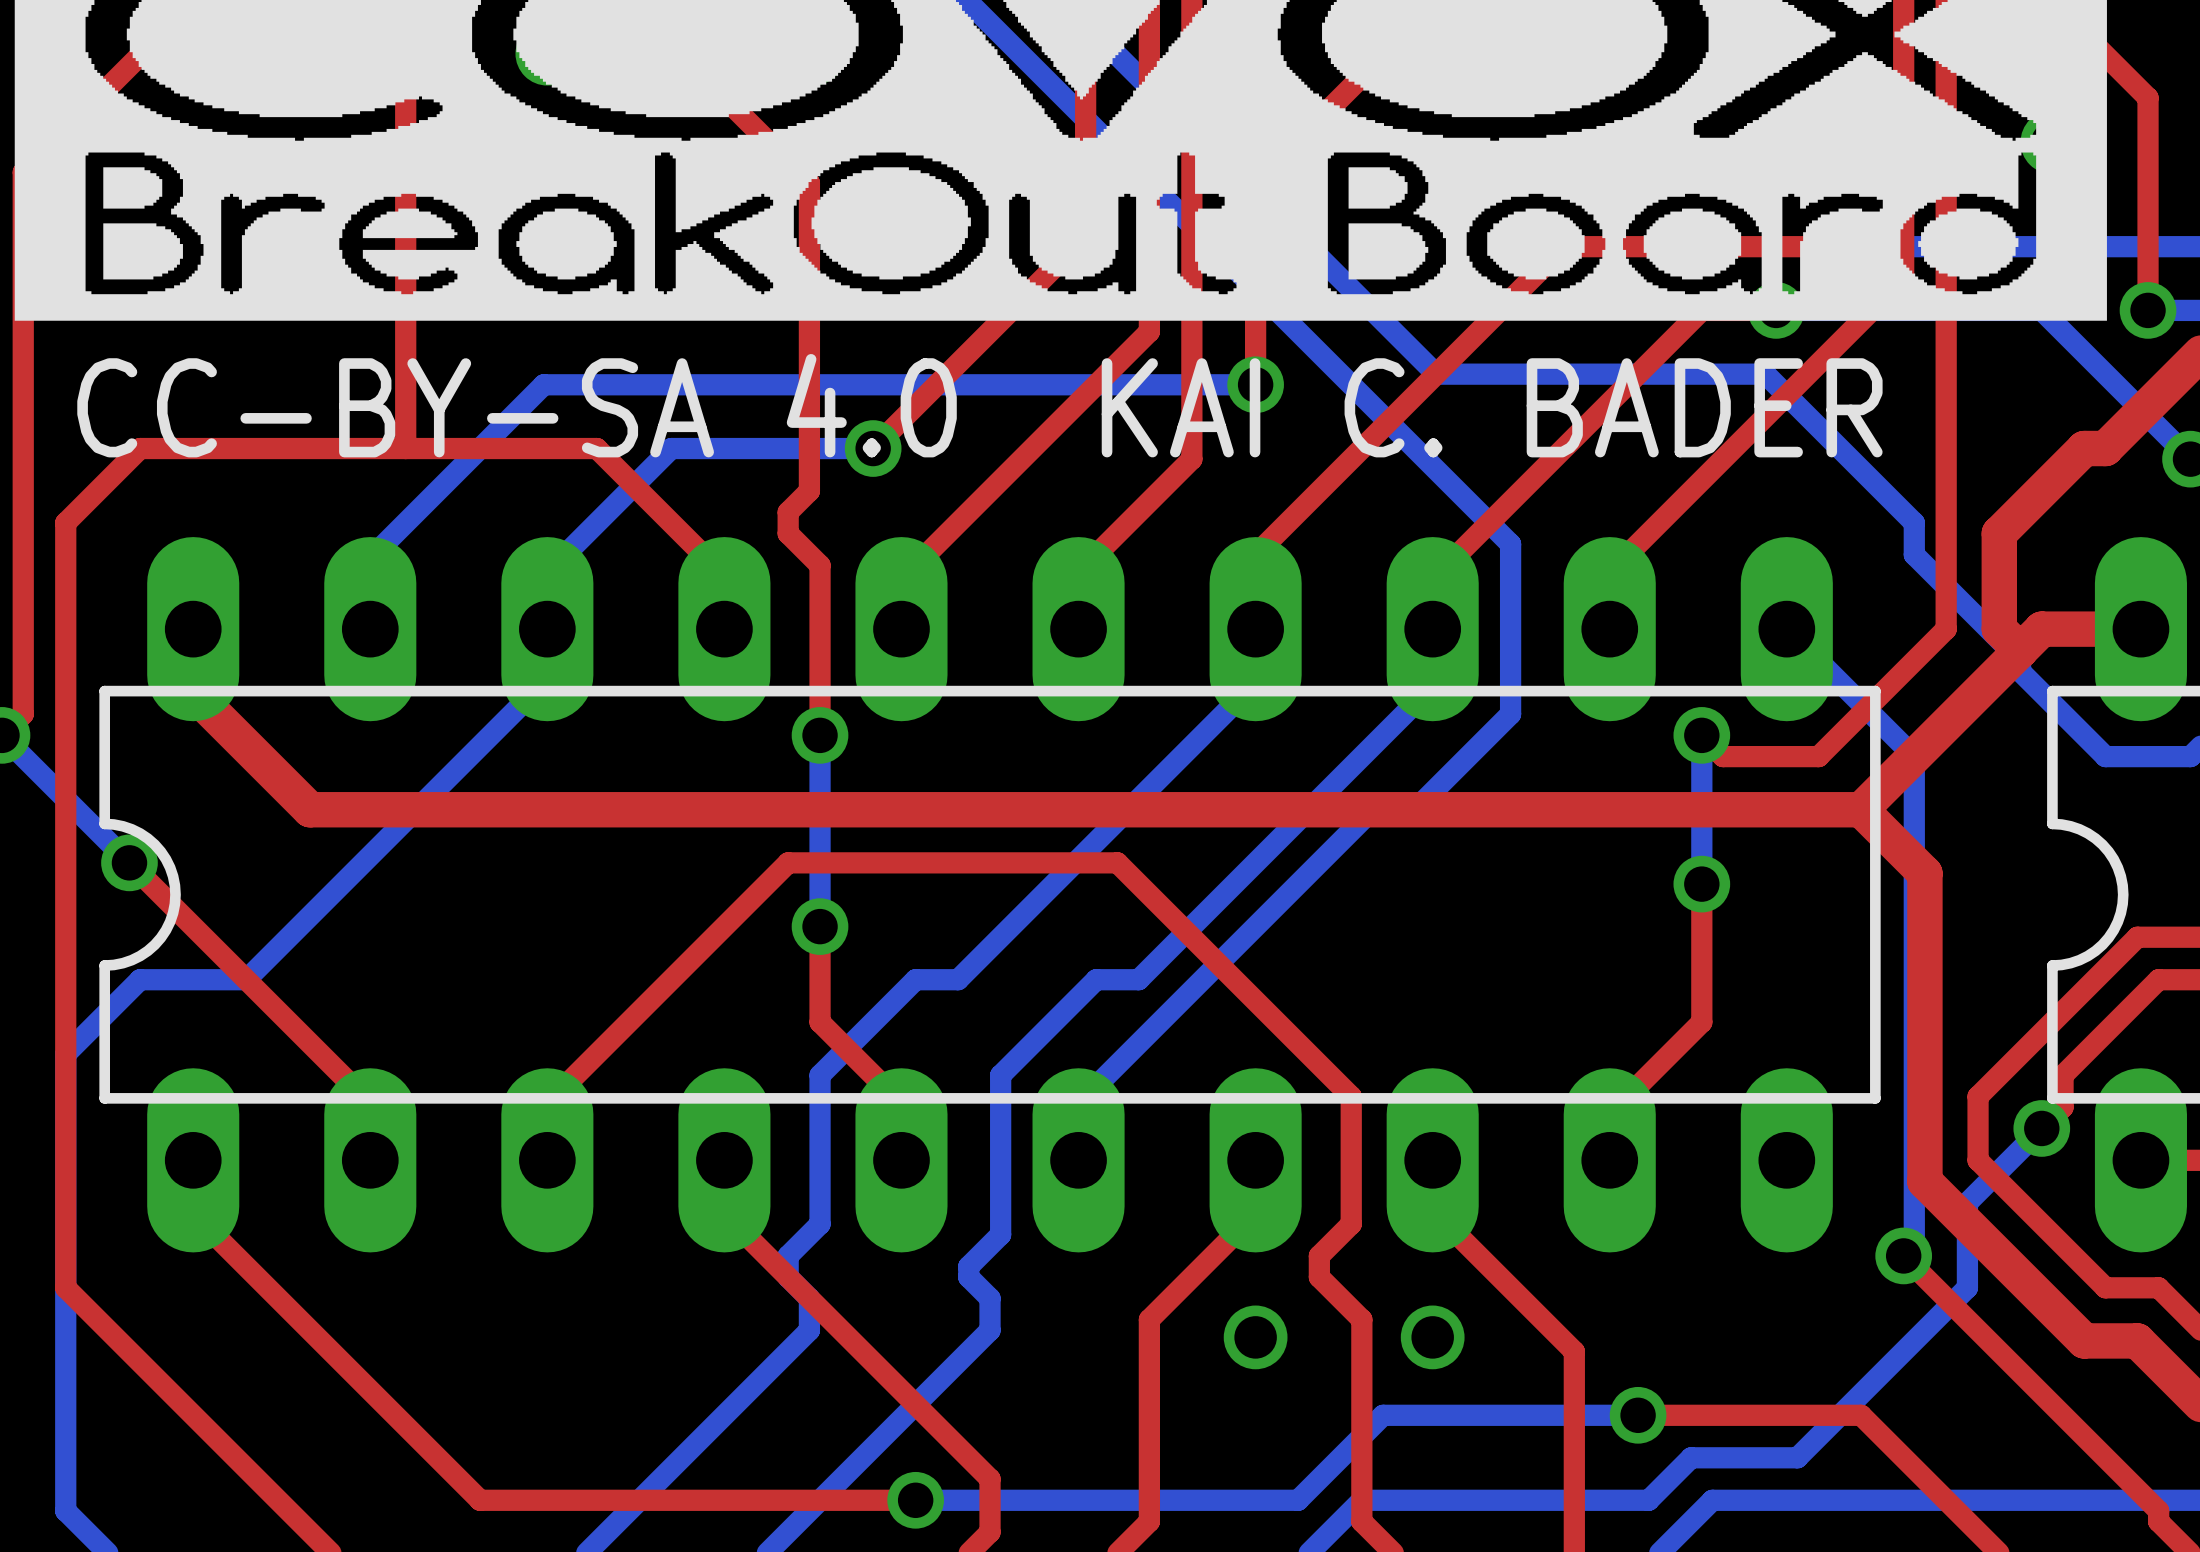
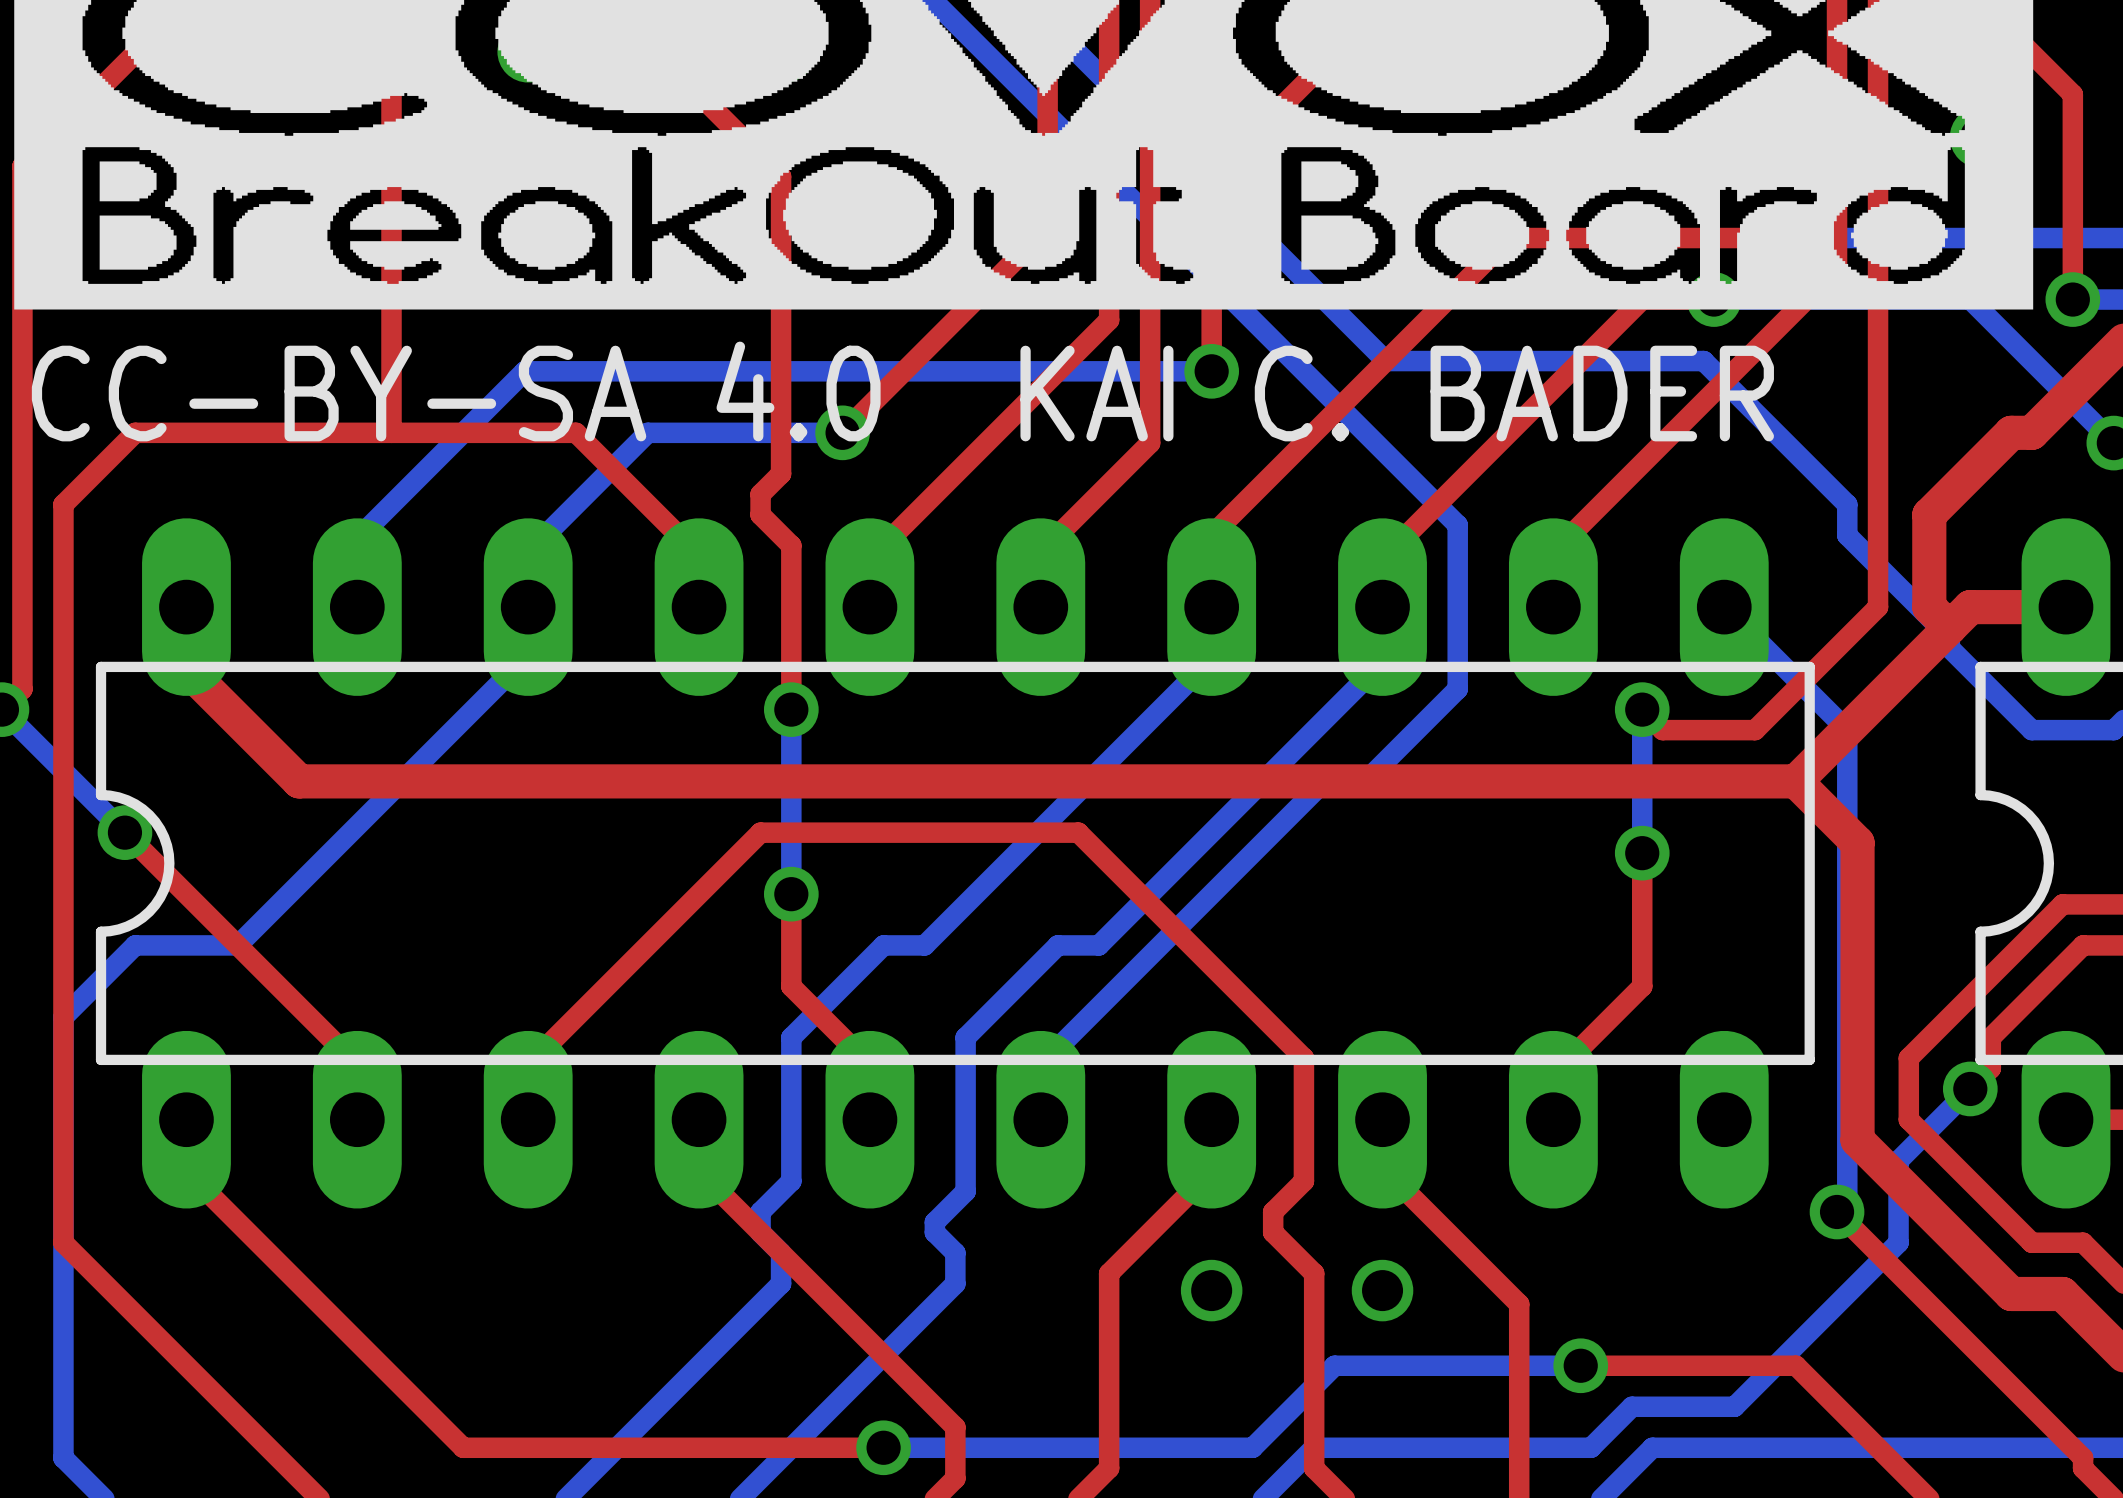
text position: CC-BY-SA 4.0 KAI C. BADER (979, 405) -> CC-BY-SA 4.0 KAI C. BADER (902, 391)

